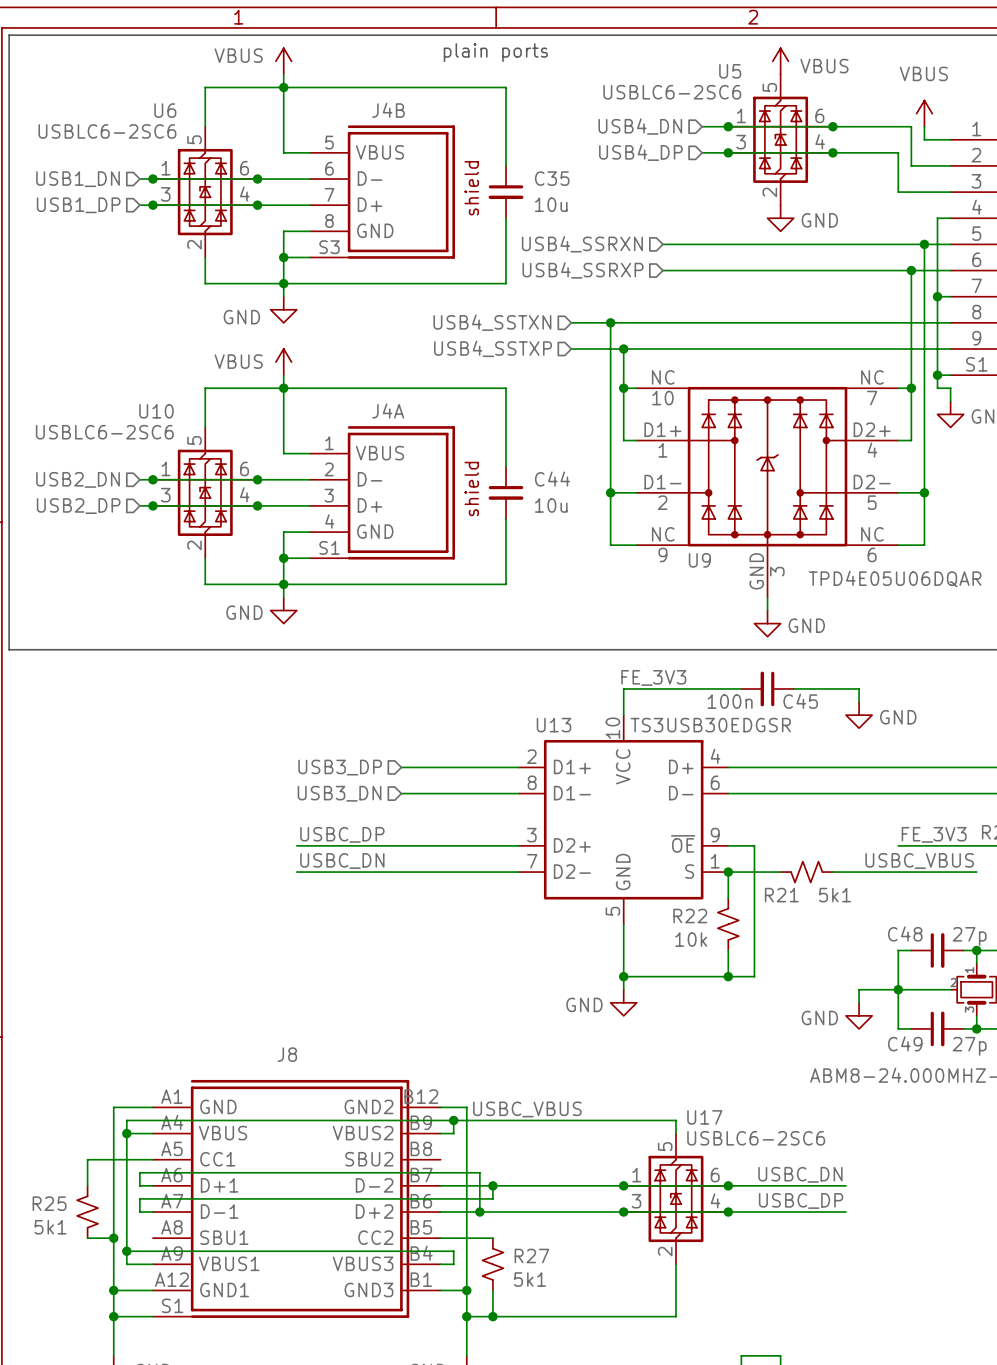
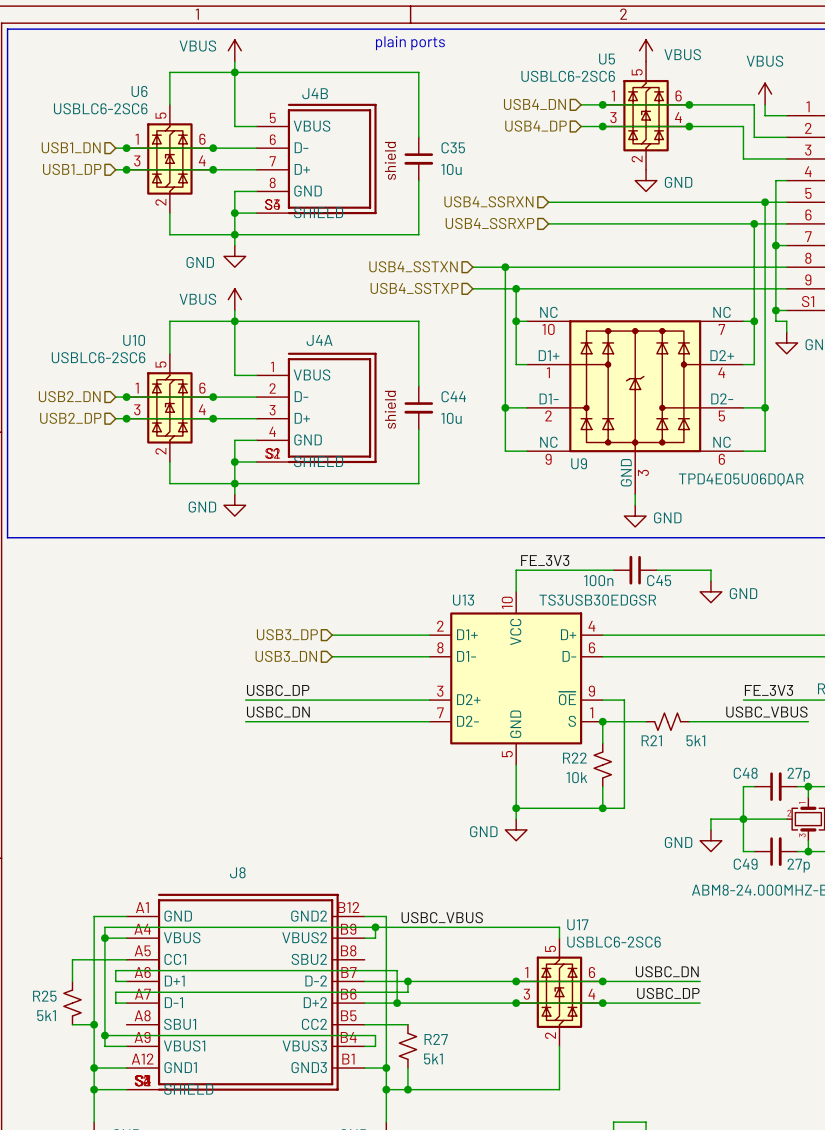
J4B symbol: [309, 125, 456, 259] -> [256, 103, 377, 215]
J4A symbol: [309, 426, 456, 560] -> [256, 352, 377, 464]
J8 symbol: [152, 1079, 441, 1318] -> [126, 893, 365, 1091]

